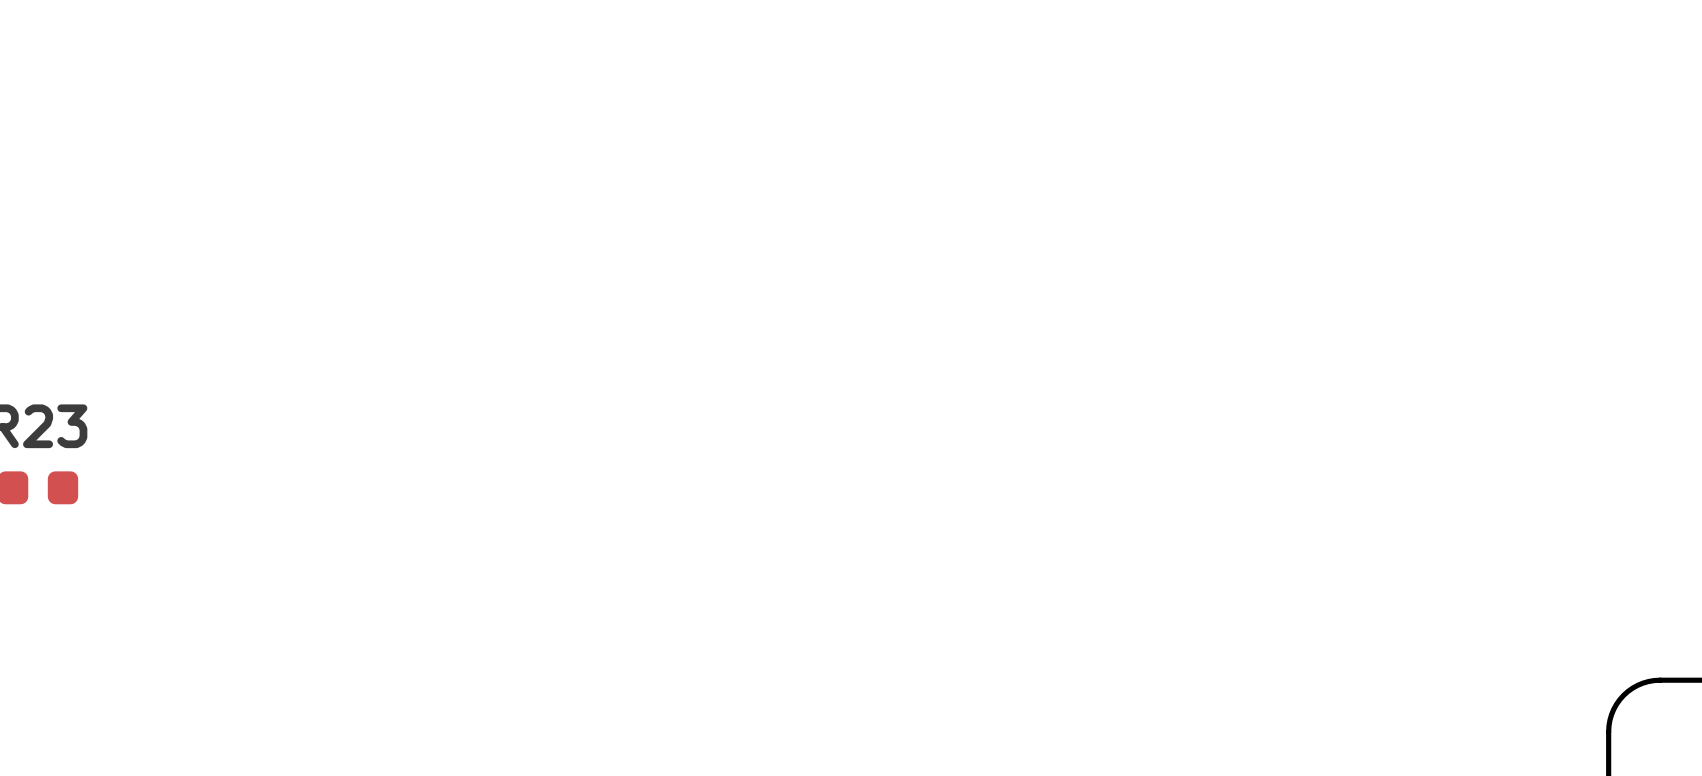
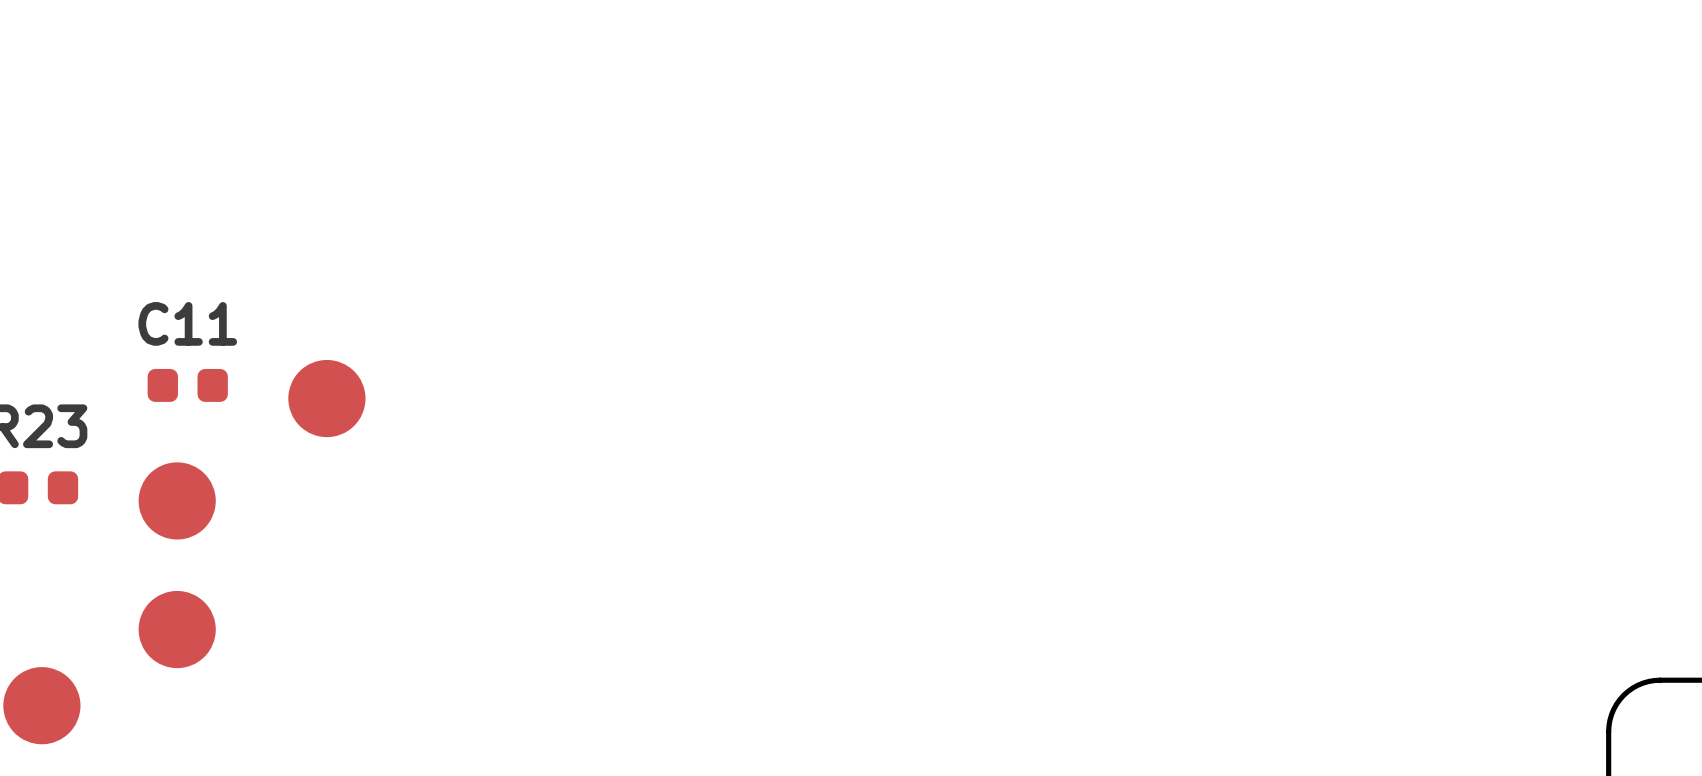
C11: none -> (187, 385)
part: none -> (326, 398)
part: none -> (177, 500)
part: none -> (177, 629)
part: none -> (41, 705)

